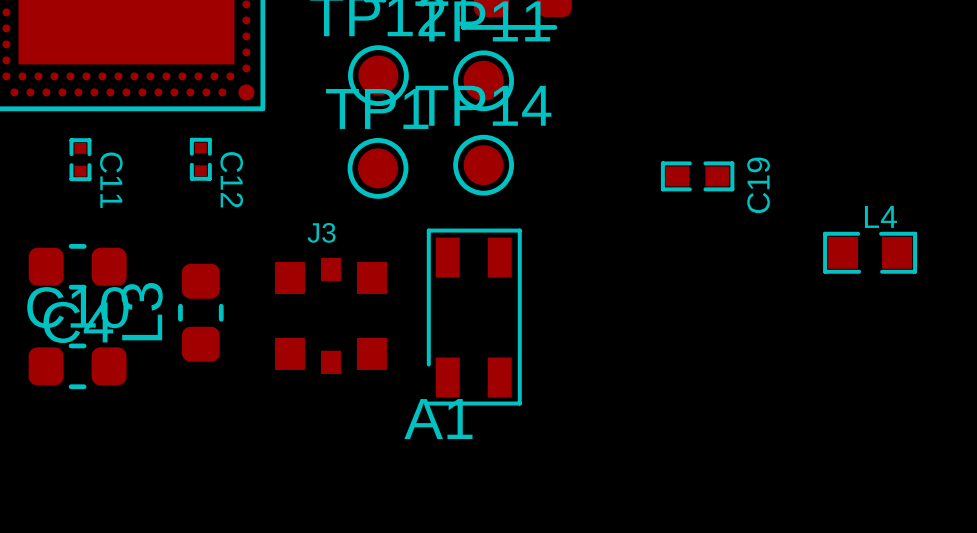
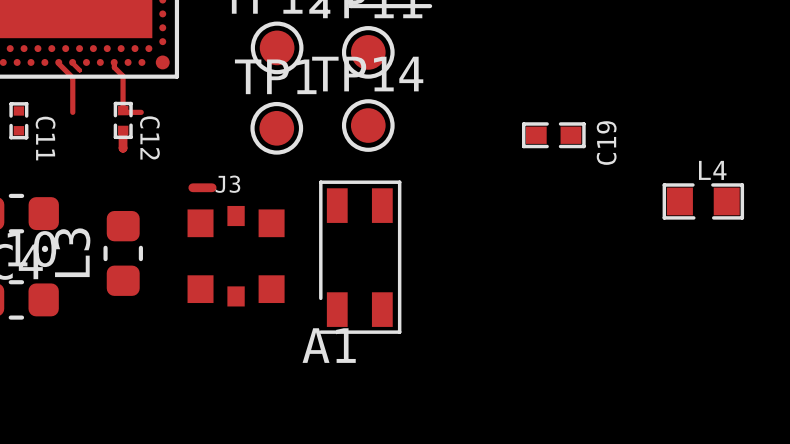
top track: none -> (114, 62) (114, 67) (123, 76) (123, 110) (124, 112) (141, 112)
top track: none -> (72, 63) (79, 70) (73, 63)
top track: none -> (58, 63) (72, 77) (72, 112)
top track: none -> (123, 130) (123, 148)
top track: none -> (192, 187) (212, 187)

